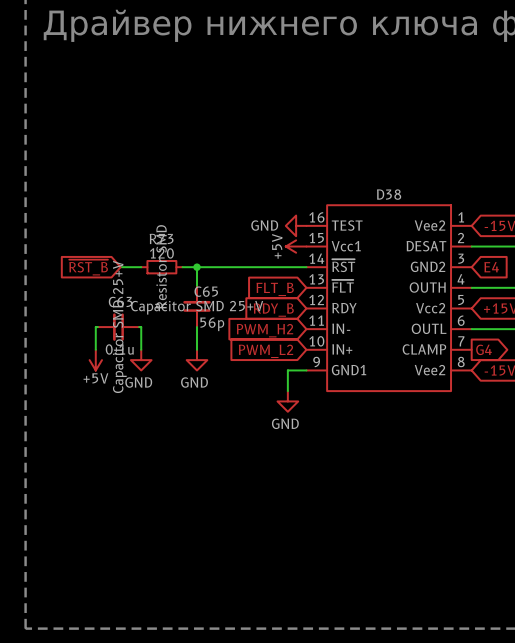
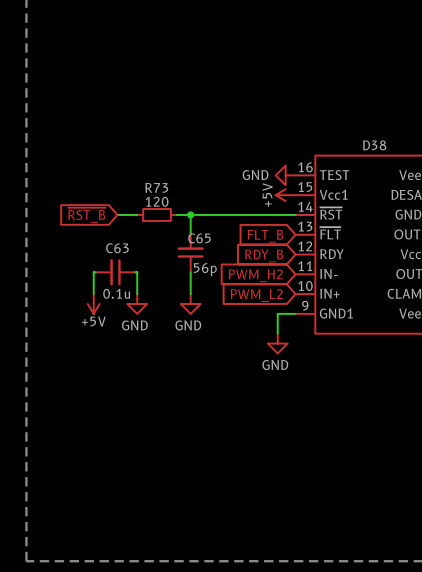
R73 text: Resistor SMD (161, 266) -> none
C65 text: Capacitor SMD 25+V (197, 307) -> none
C63 text: Capacitor SMD 25+V (119, 326) -> none

